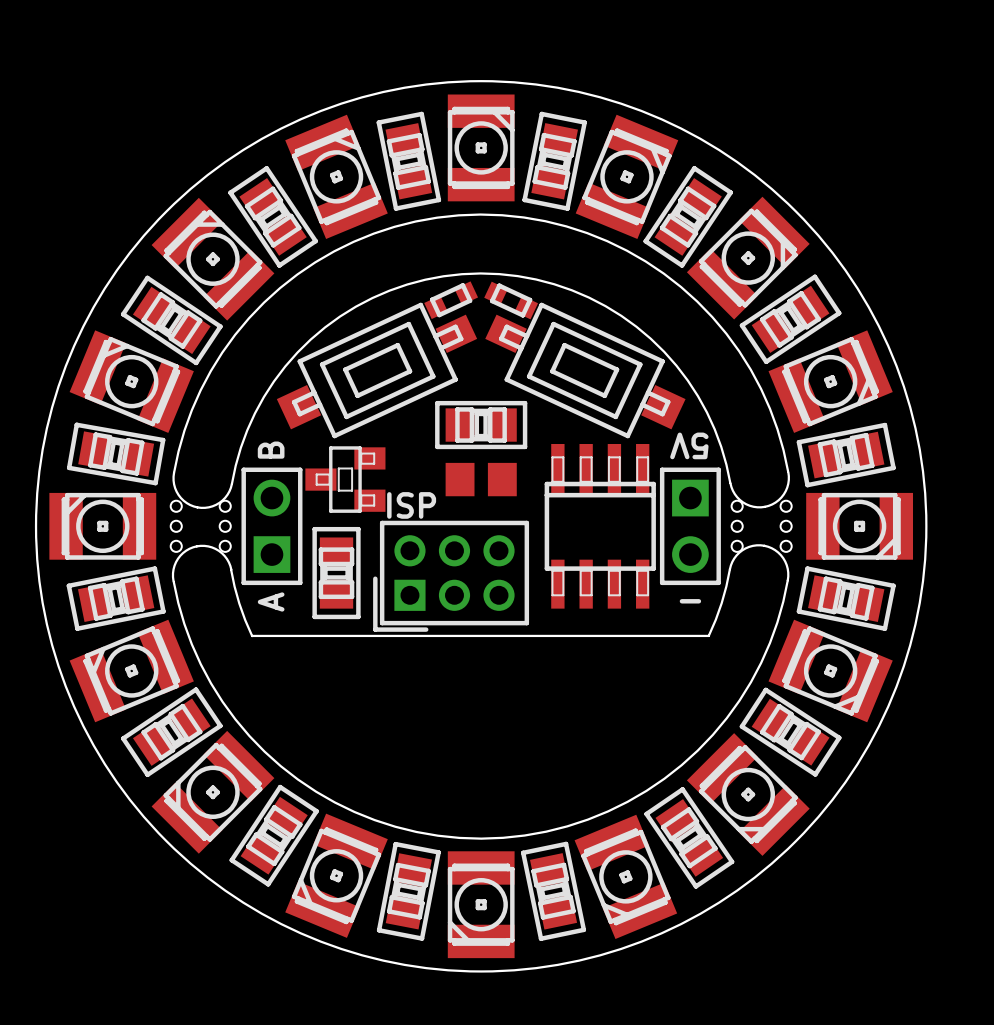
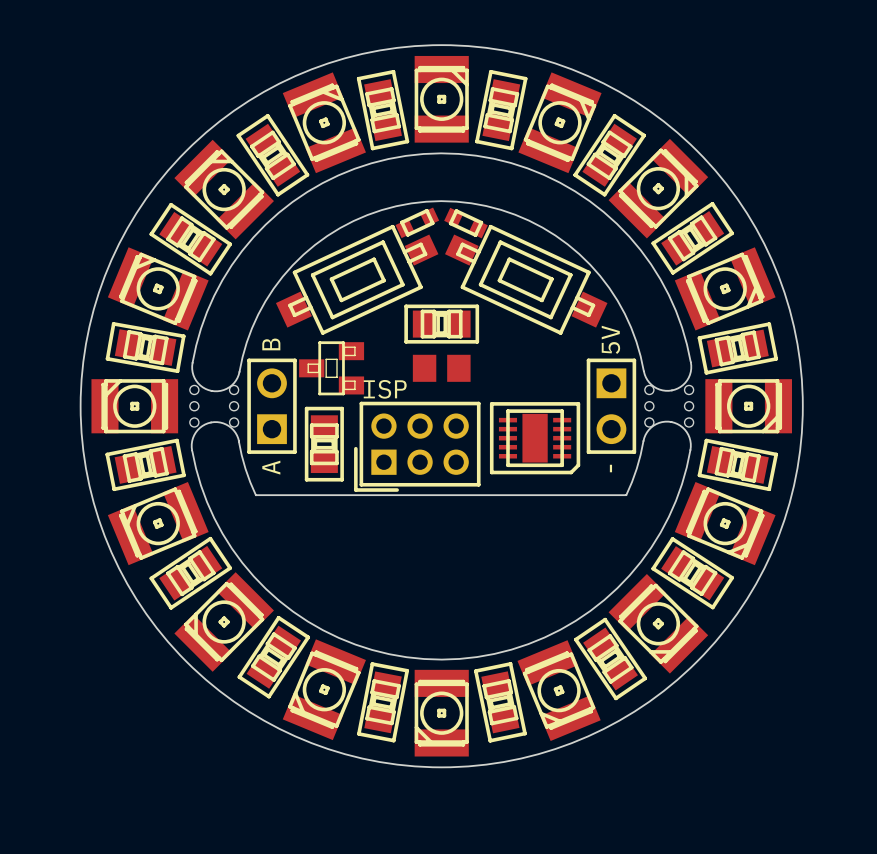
text rotation: 0° (689, 445) -> 90° clockwise (610, 339)
part: (600, 526) -> none
part: none -> (535, 438)
text rotation: 0° (690, 601) -> 90° counterclockwise (610, 468)

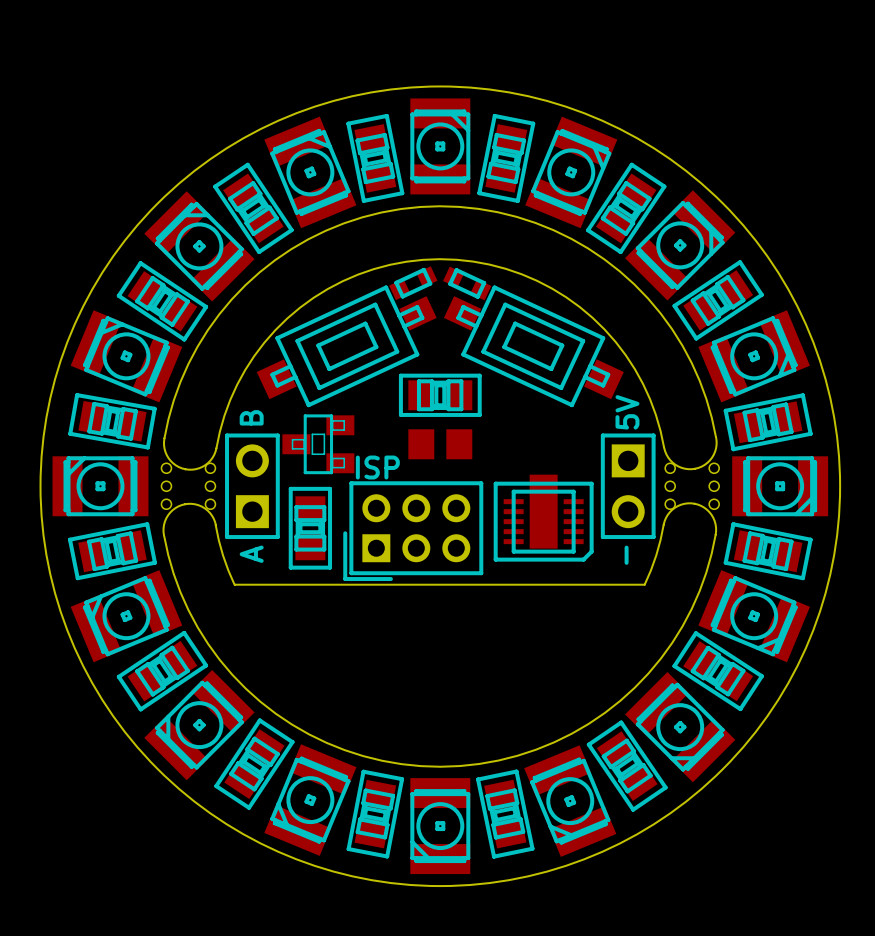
part footprint: [489, 402, 581, 475] -> [493, 474, 594, 562]

